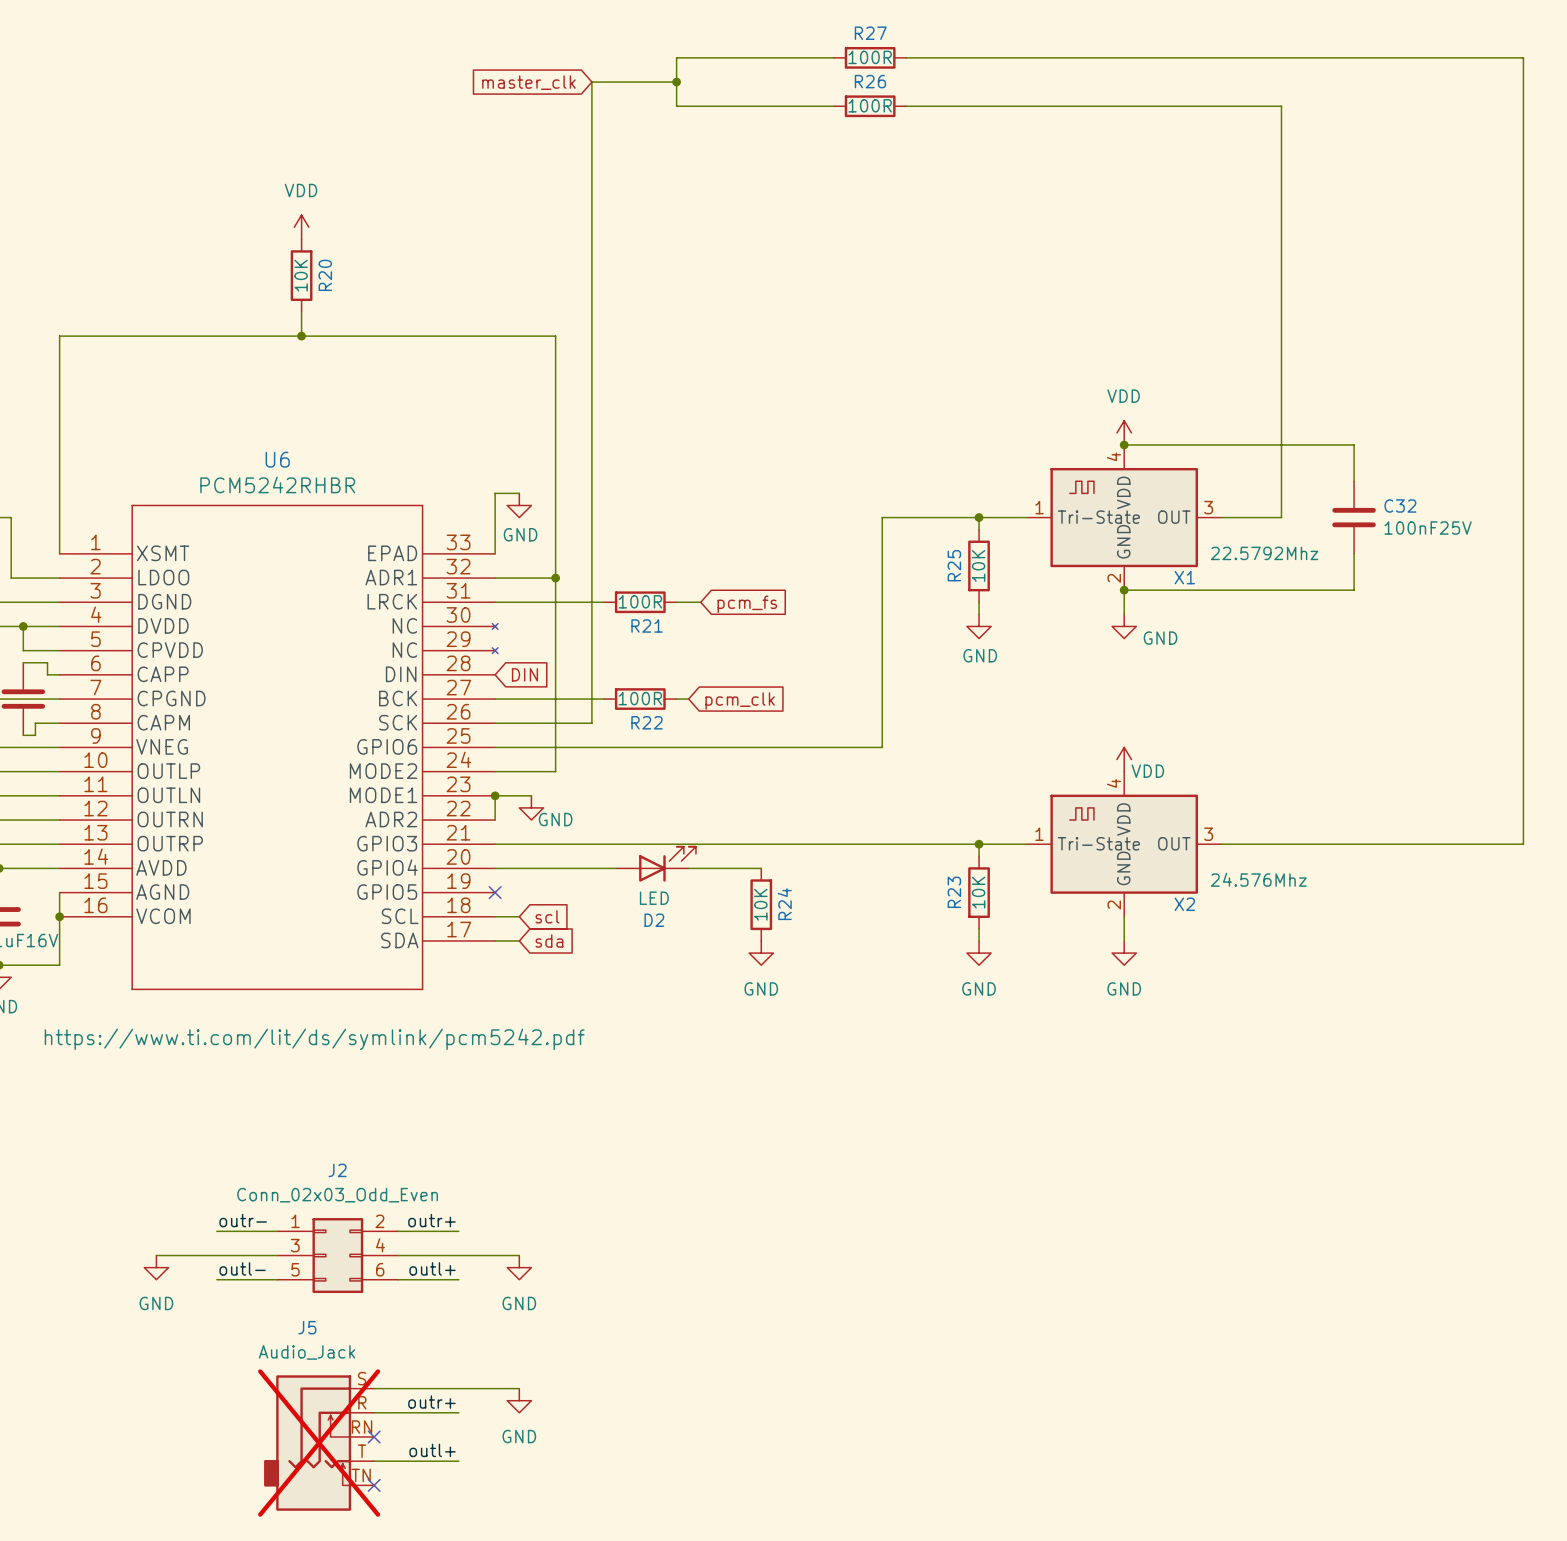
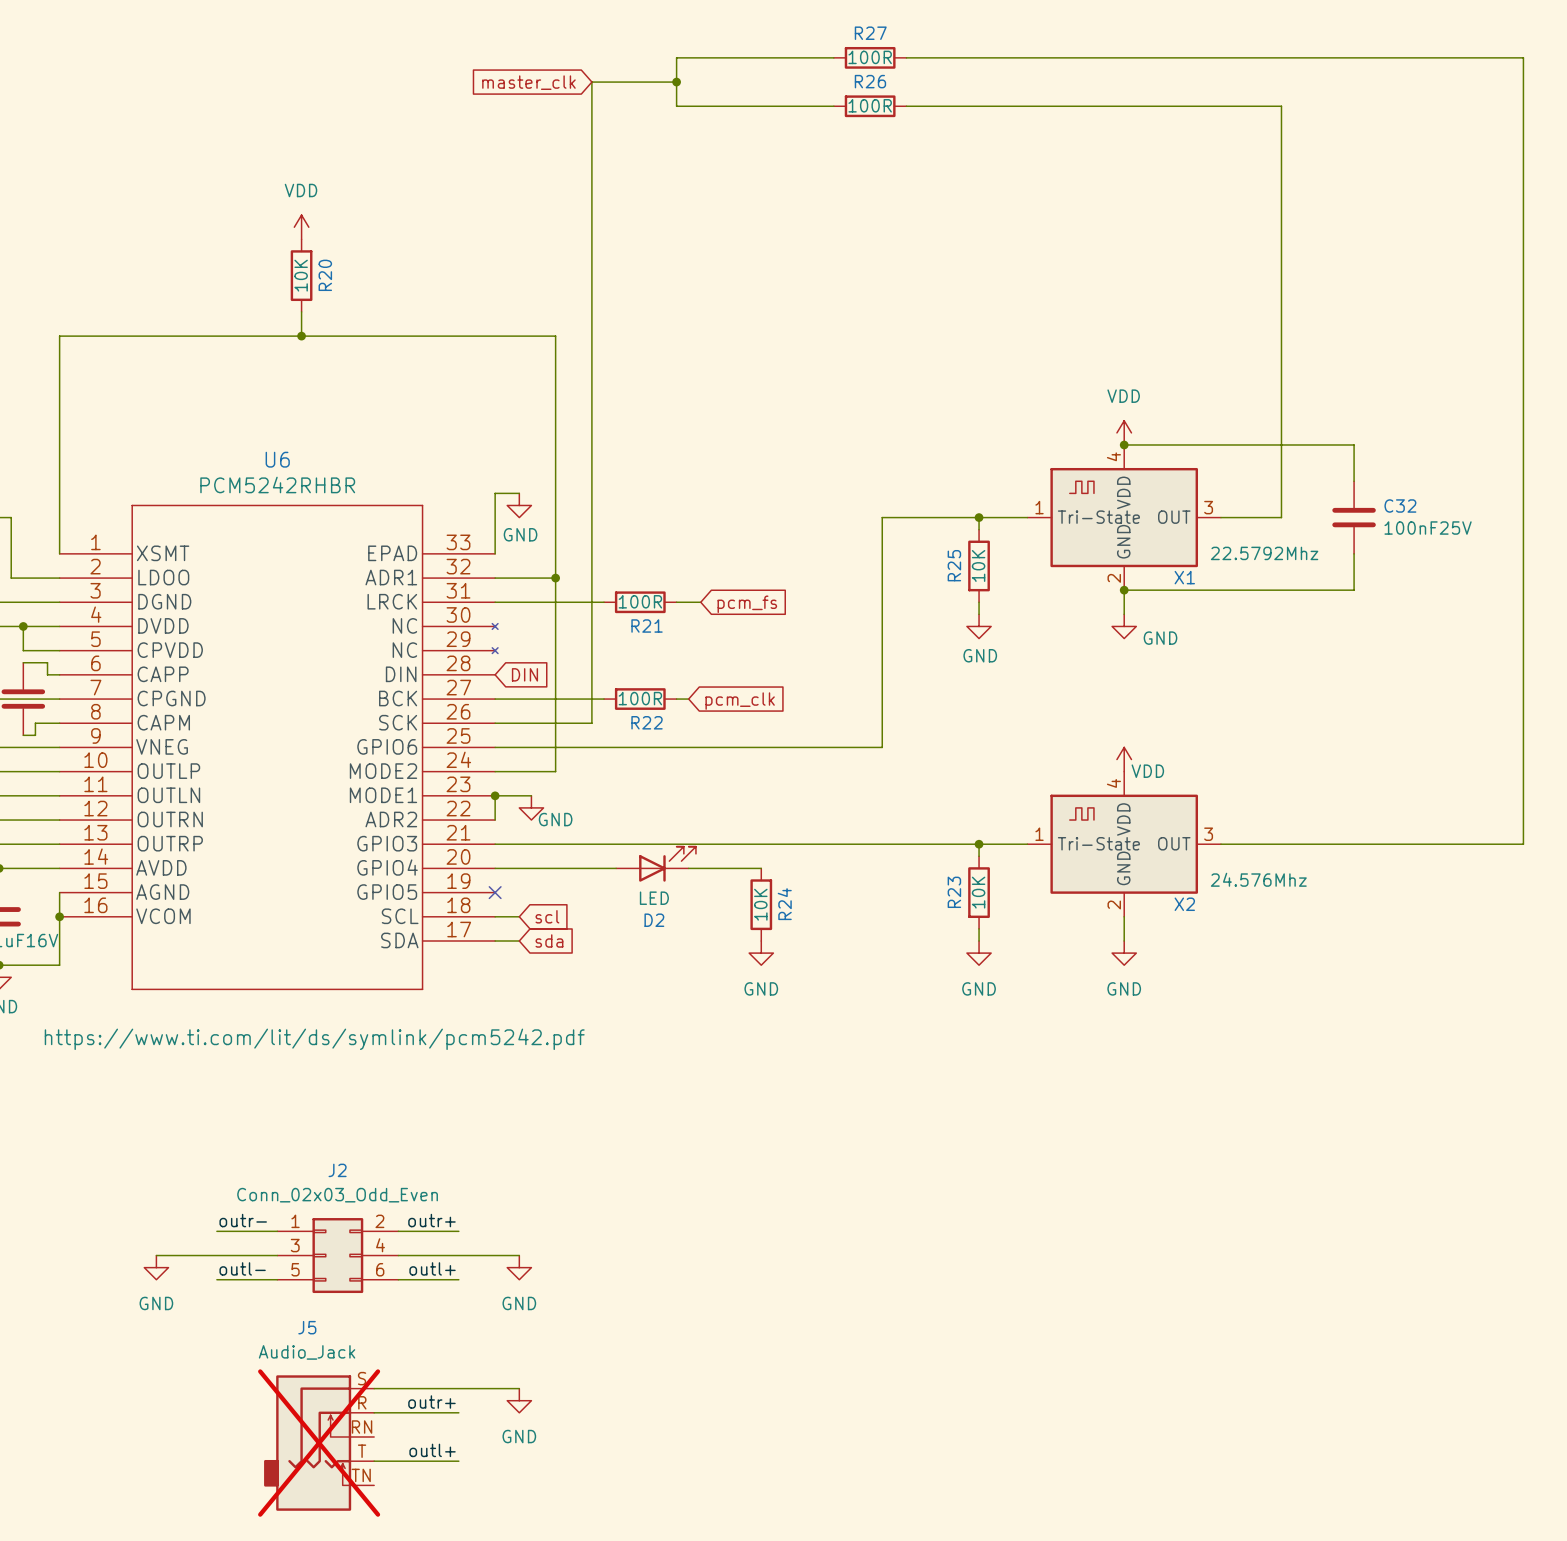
no-connect mark: (374, 1437) -> none
no-connect mark: (374, 1485) -> none

